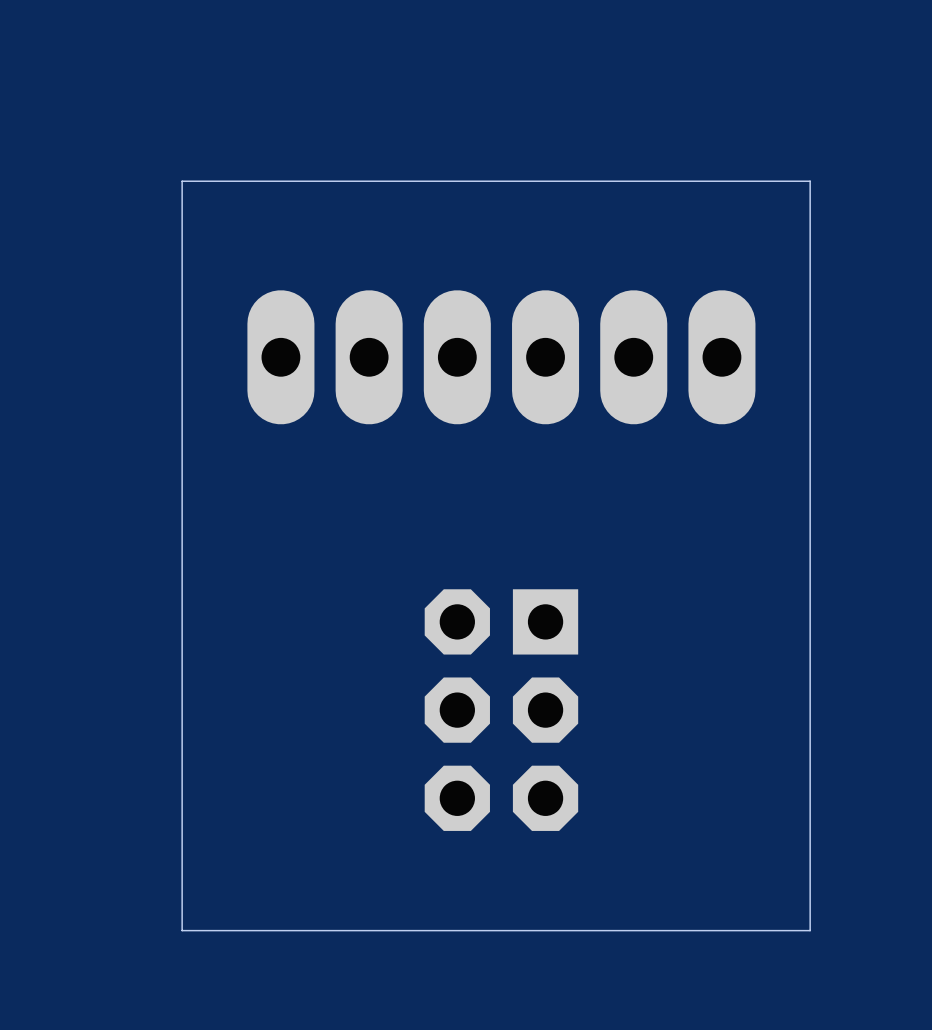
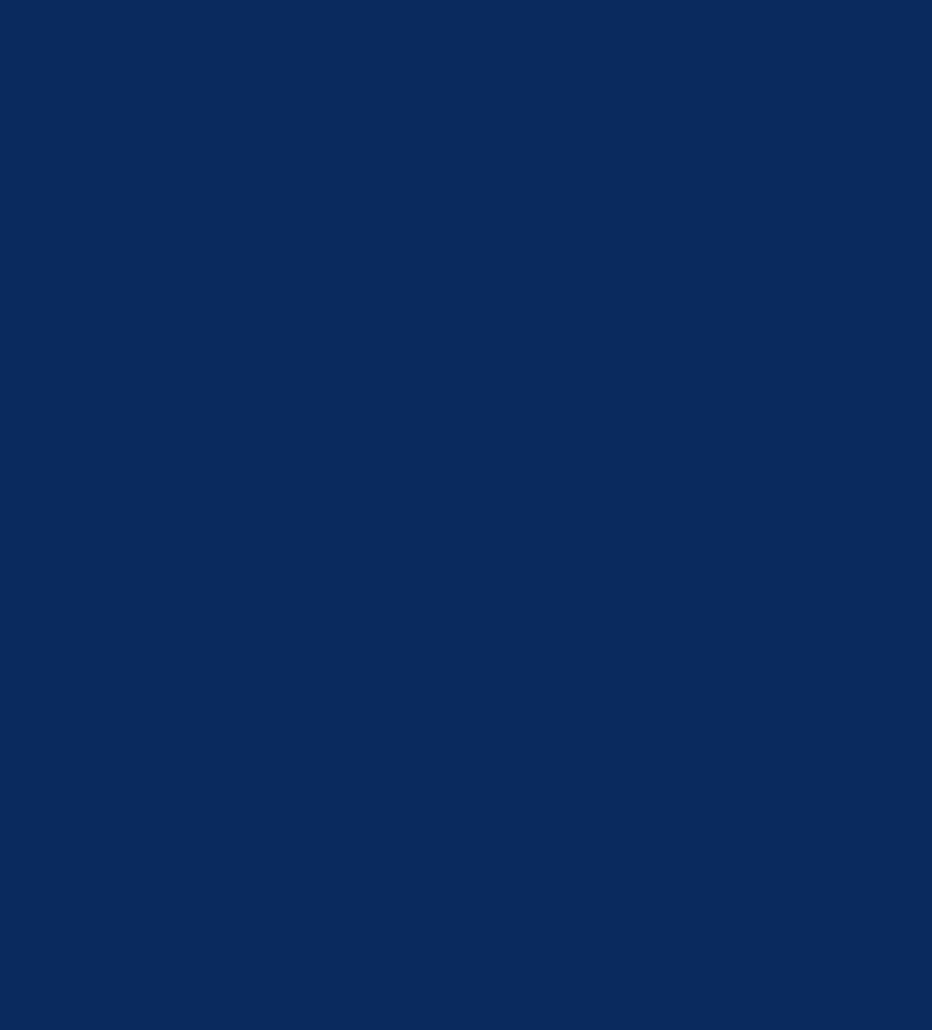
board edge: (810, 181) (182, 181) (182, 930) (810, 930) (810, 181) -> none
part: (501, 357) -> none
part: (501, 710) -> none

